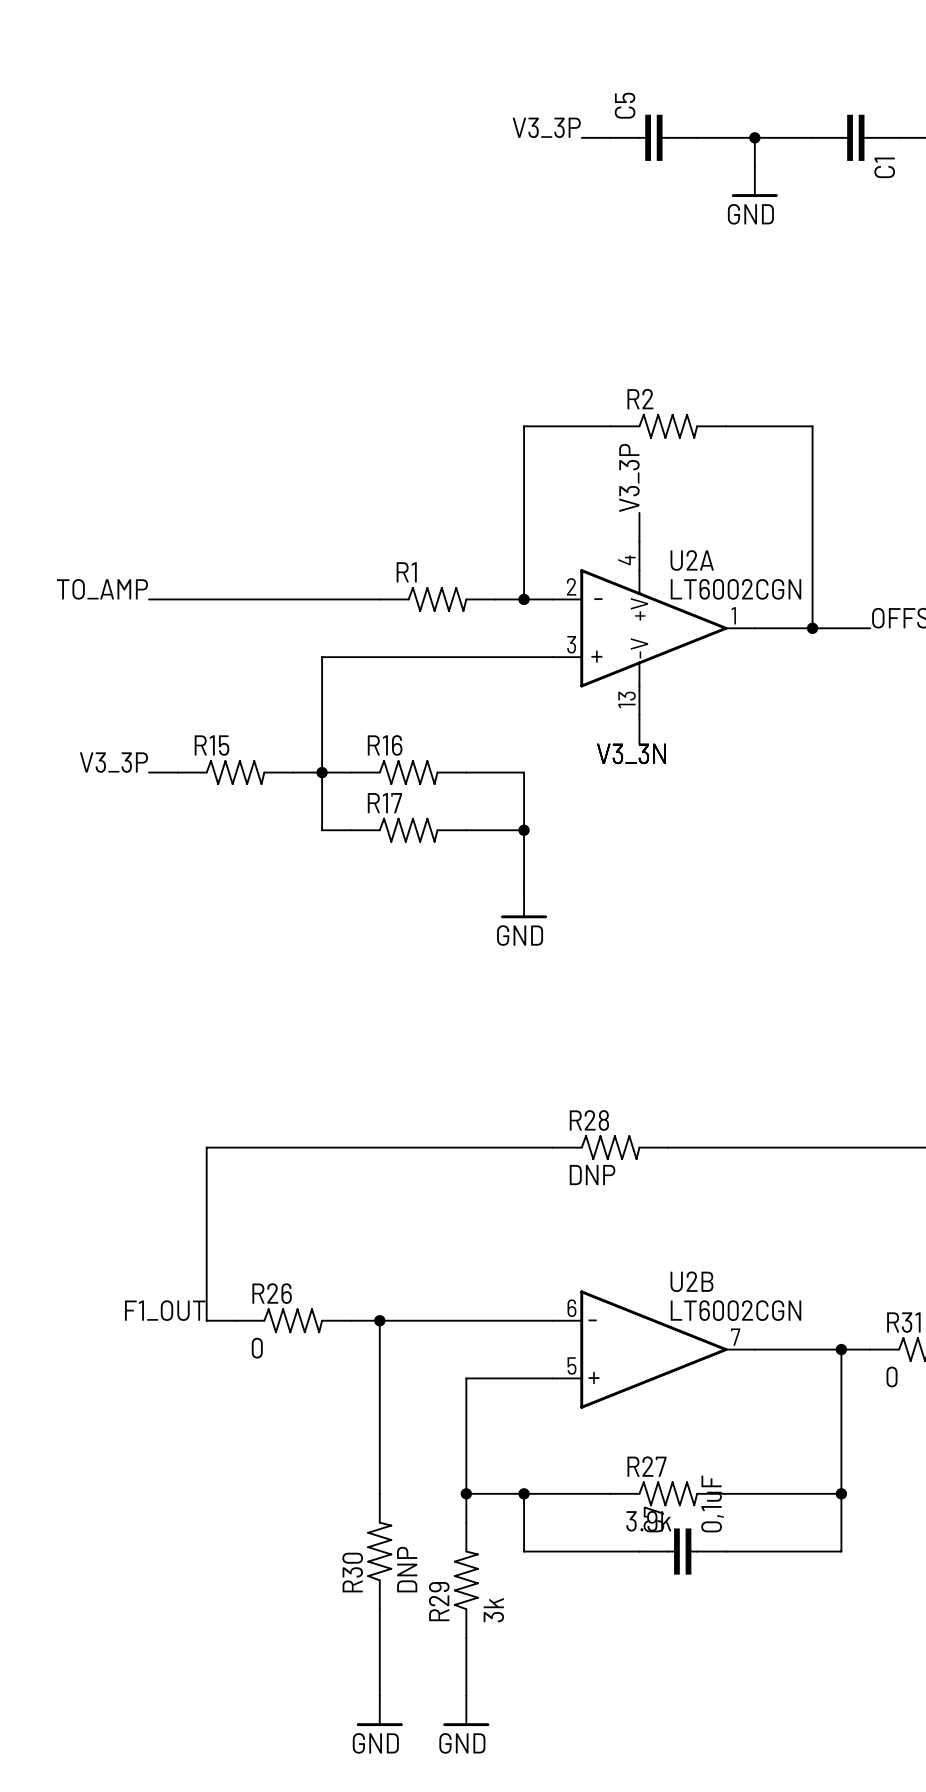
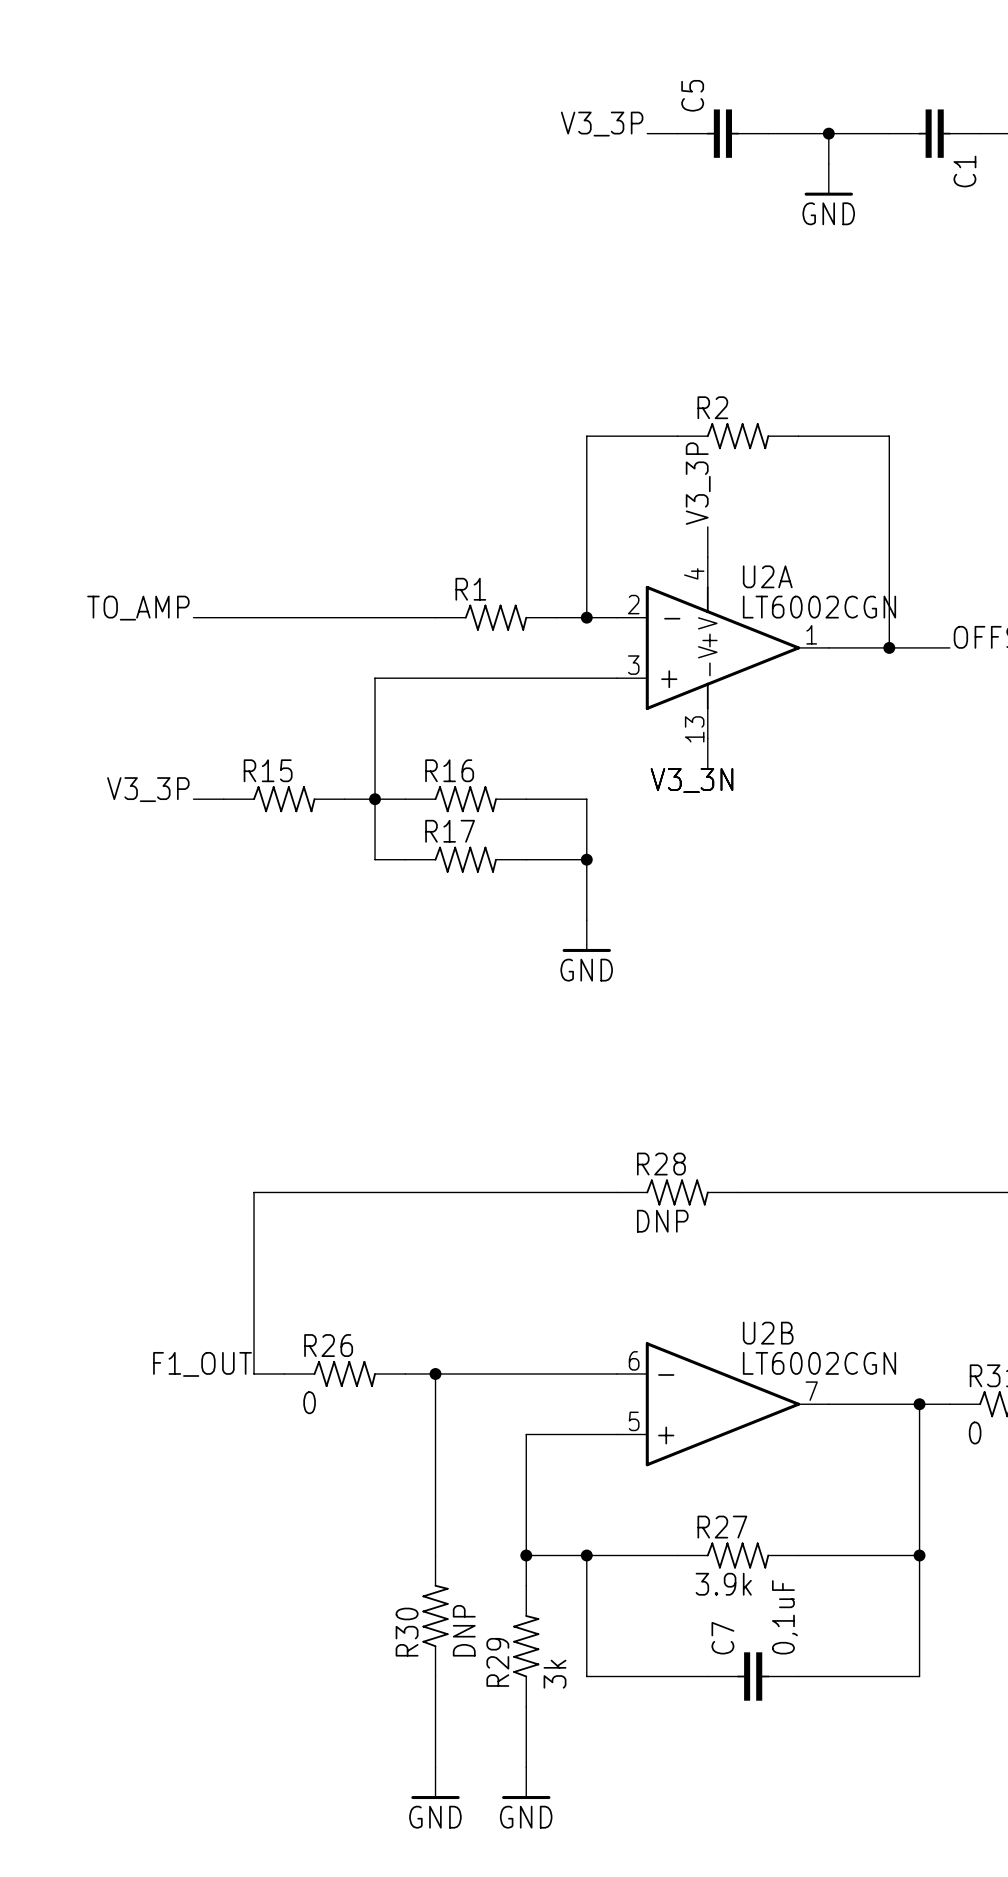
wire: (524, 1551) (639, 1551) -> (586, 1616) (586, 1676) (707, 1676)
C7 position: (682, 1551) -> (753, 1676)
wire: (726, 1551) (841, 1551) -> (798, 1676) (919, 1676) (919, 1616)

